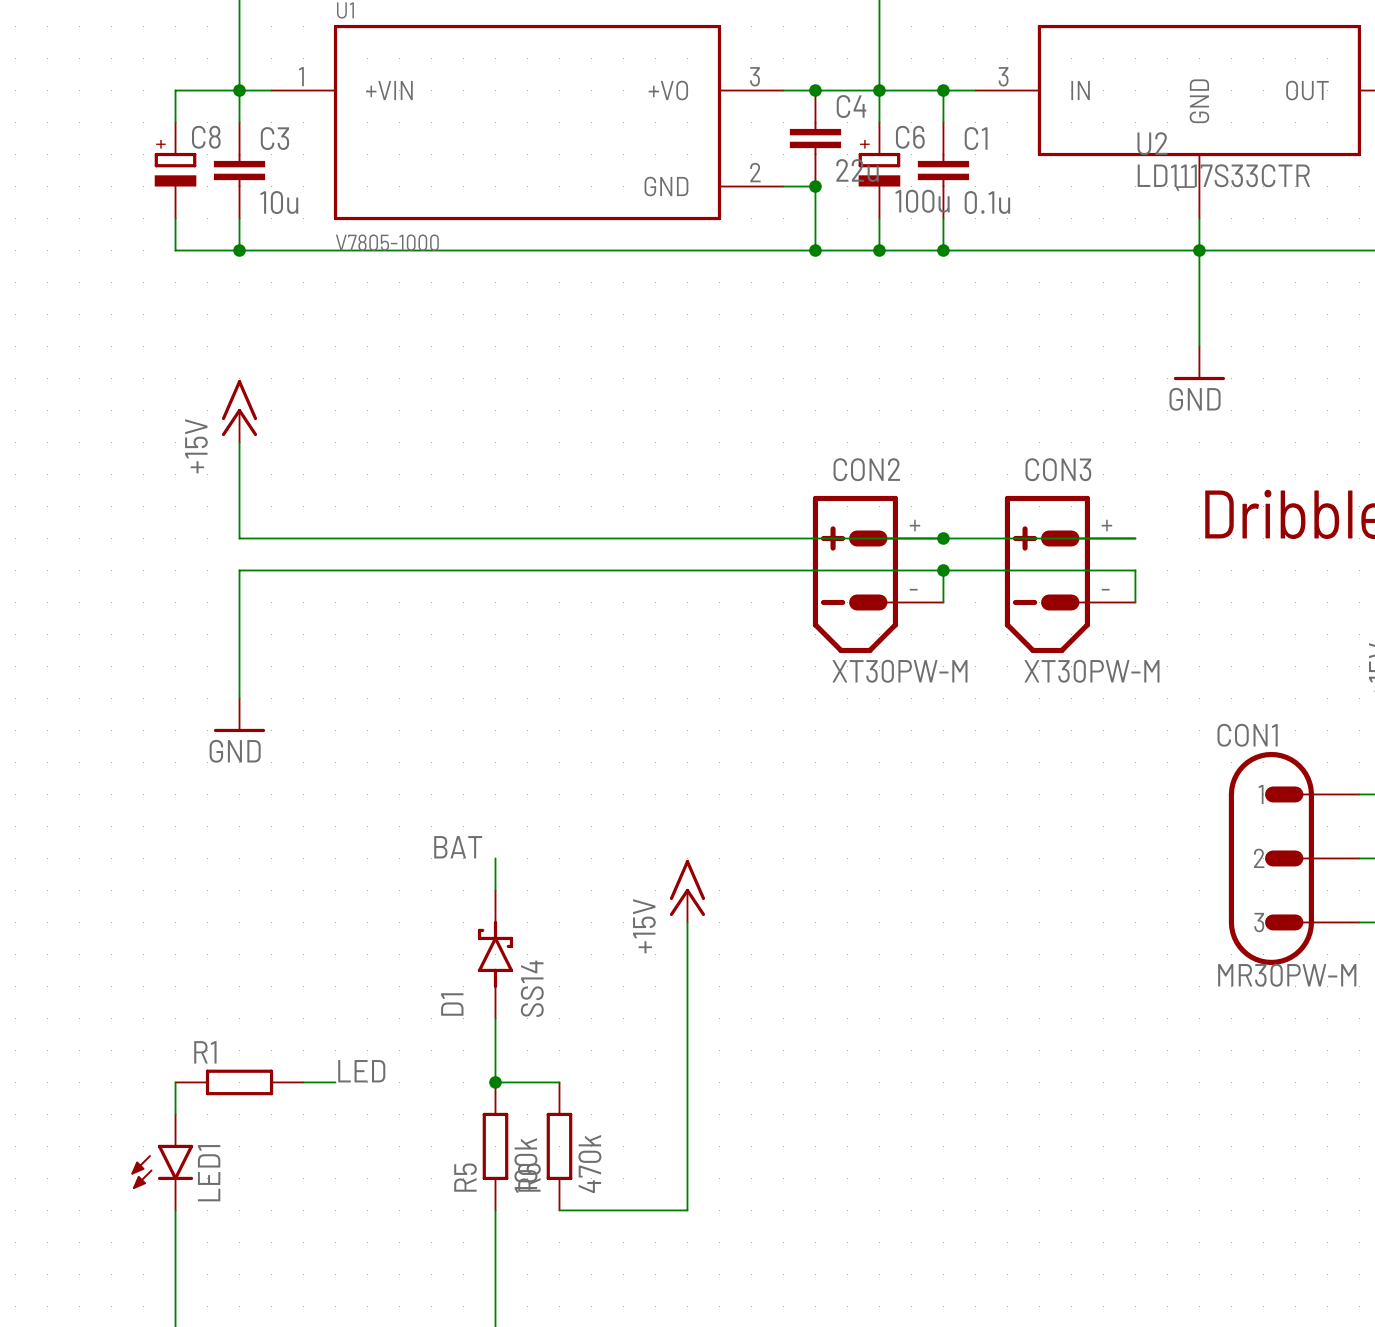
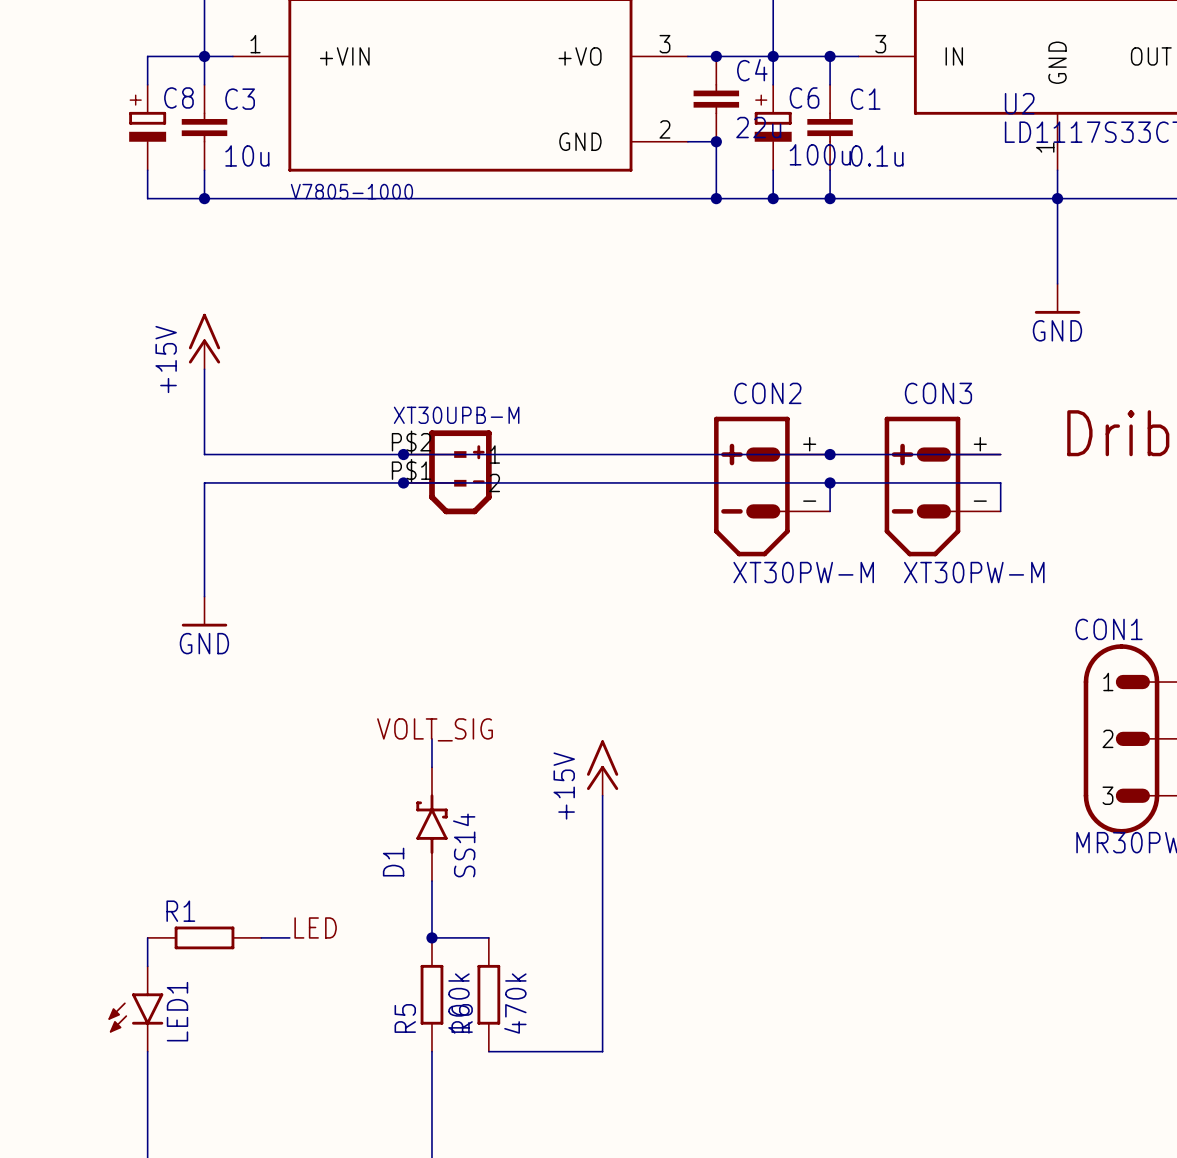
junction: none -> (403, 454)
part: none -> (447, 472)
junction: none -> (403, 482)
label: BAT (458, 847) -> VOLT_SIG (435, 729)

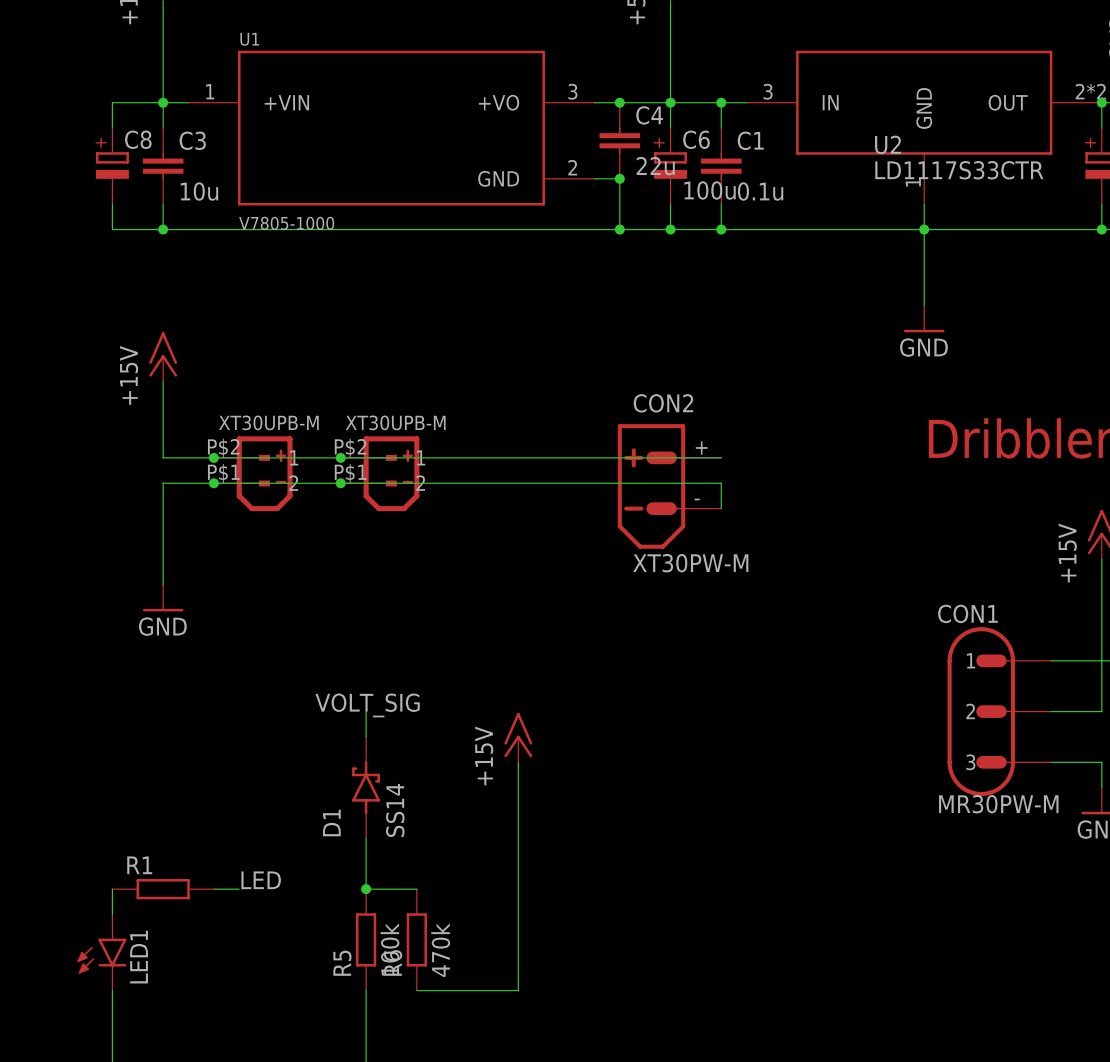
junction: none -> (213, 457)
wire: (830, 454) (1000, 454) -> none
junction: (830, 454) -> none
part: none -> (253, 473)
junction: none -> (213, 483)
wire: (830, 482) (1000, 482) (1000, 511) -> none
junction: (830, 482) -> none
CON3: XT30PW-M (942, 486) -> none

